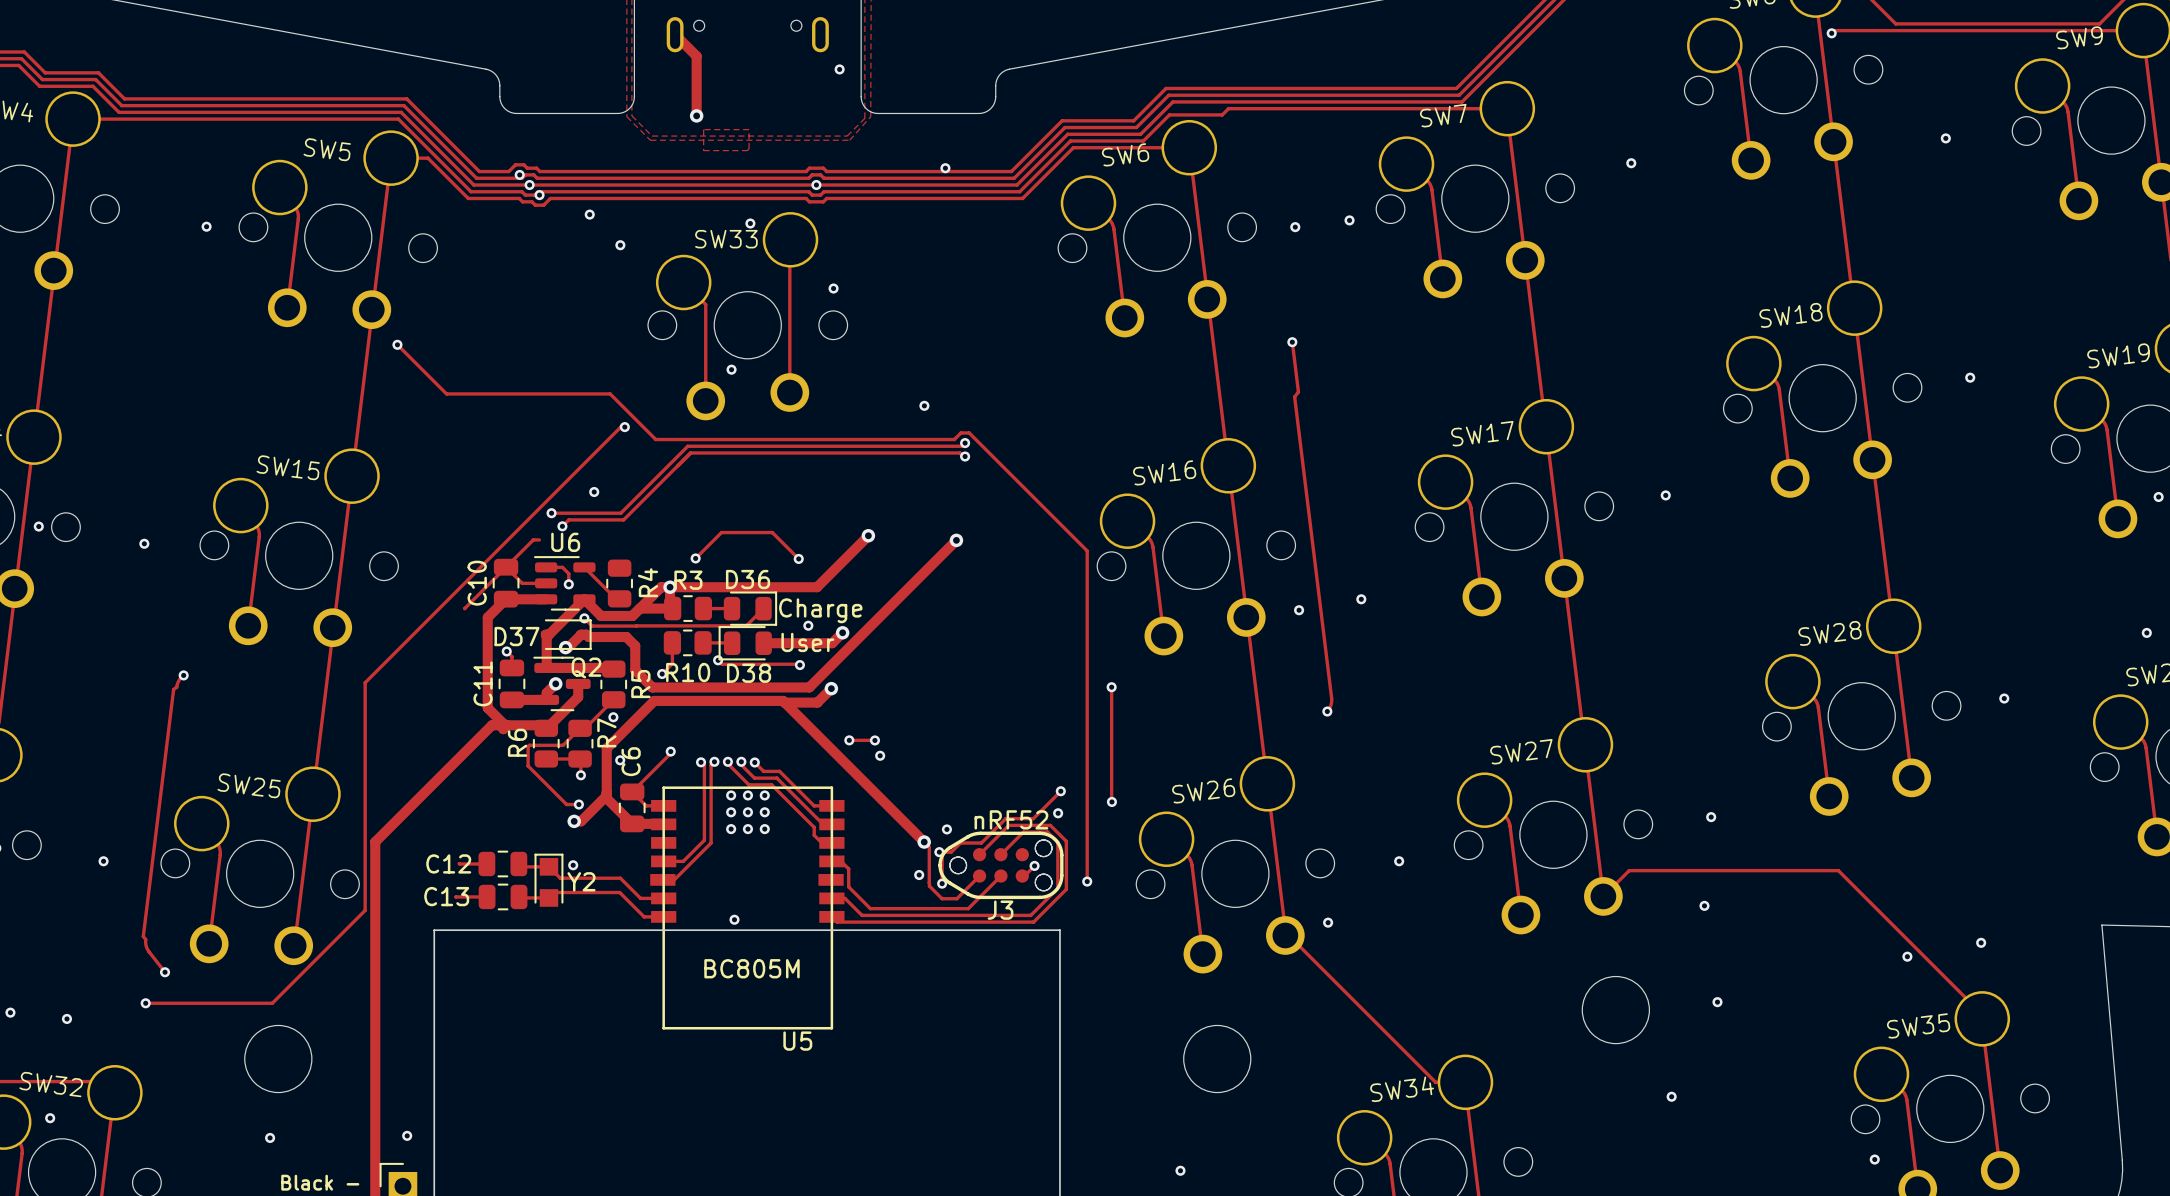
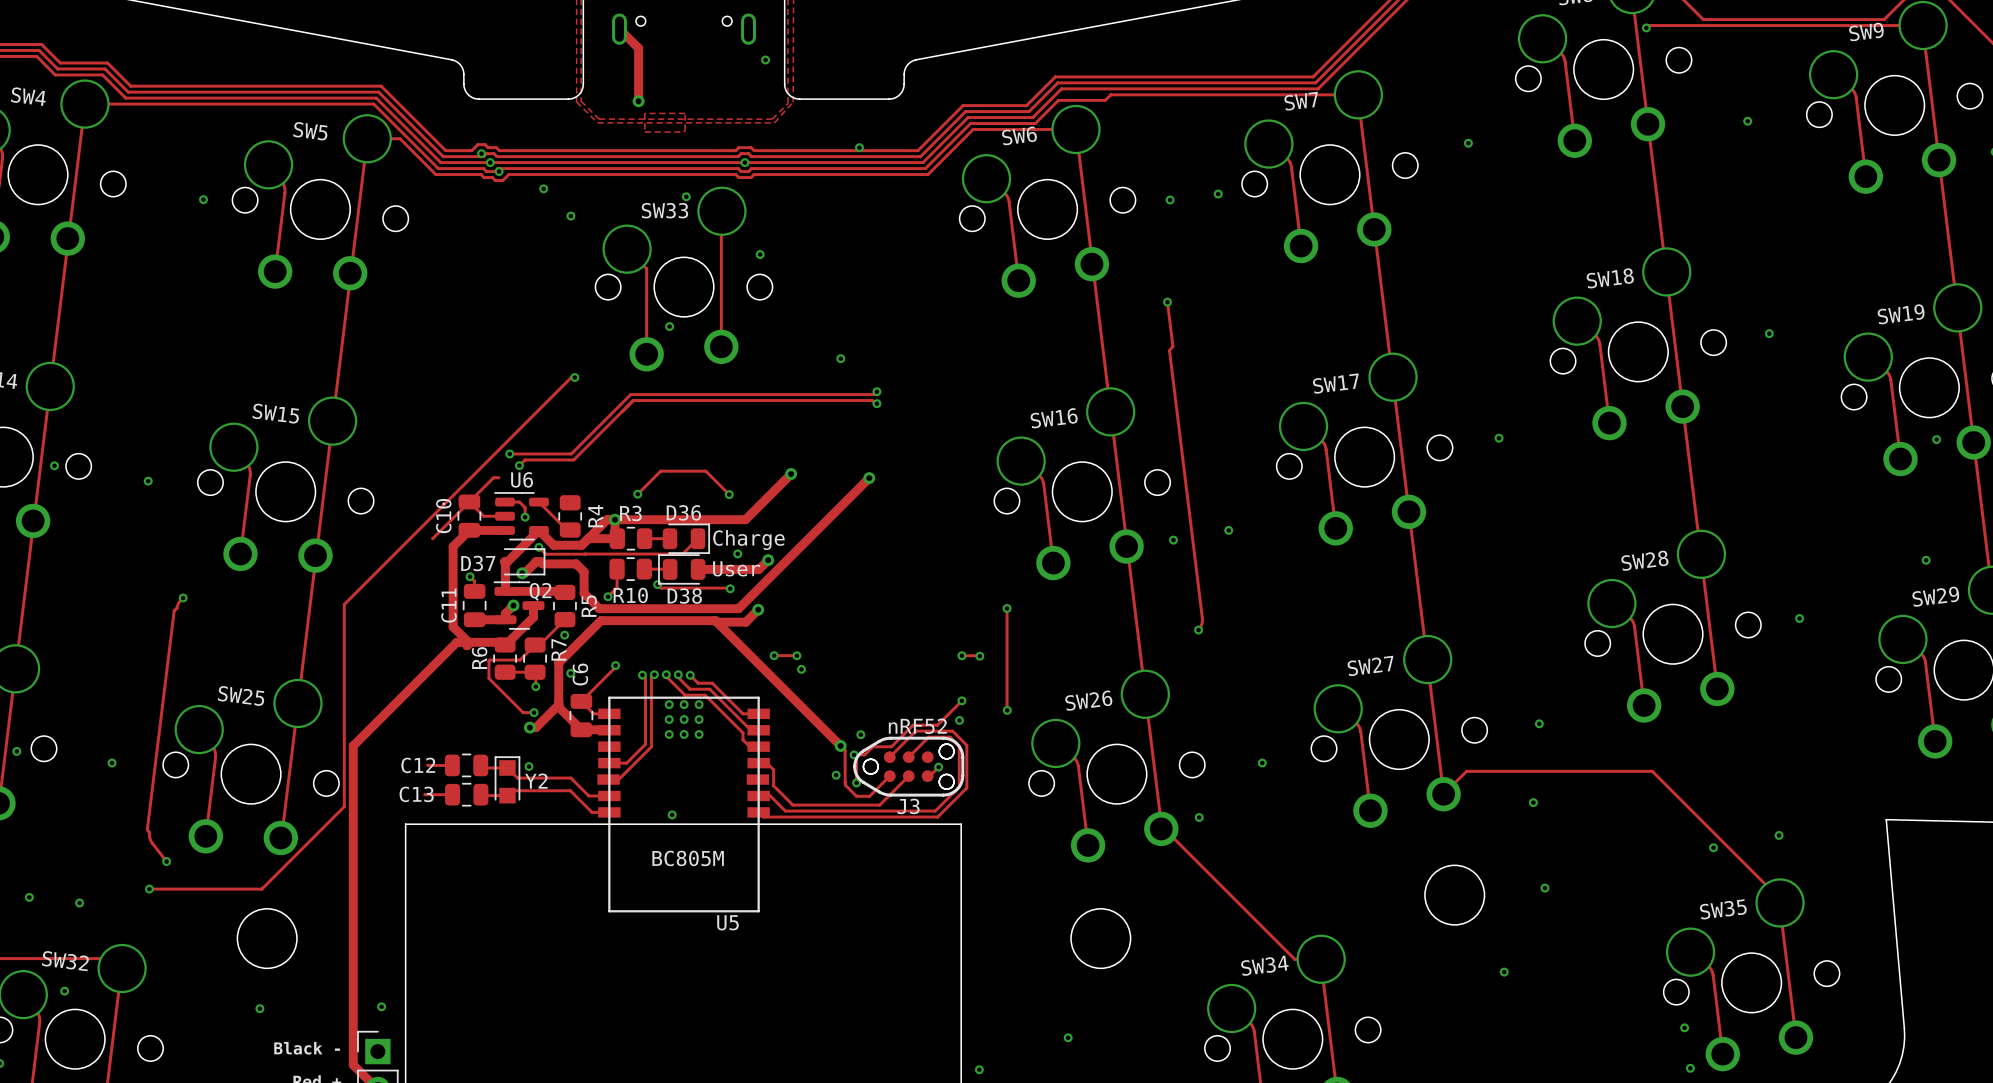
track: (397, 344) (446, 393) (610, 393) (655, 439) (954, 439) (960, 432) (969, 432) (1087, 550) (1087, 881) -> none
via: (397, 344) -> none
via: (594, 492) -> none
track: none -> (961, 655) (979, 656)
via: none -> (961, 655)
via: none -> (979, 656)
via: (1087, 881) -> none

